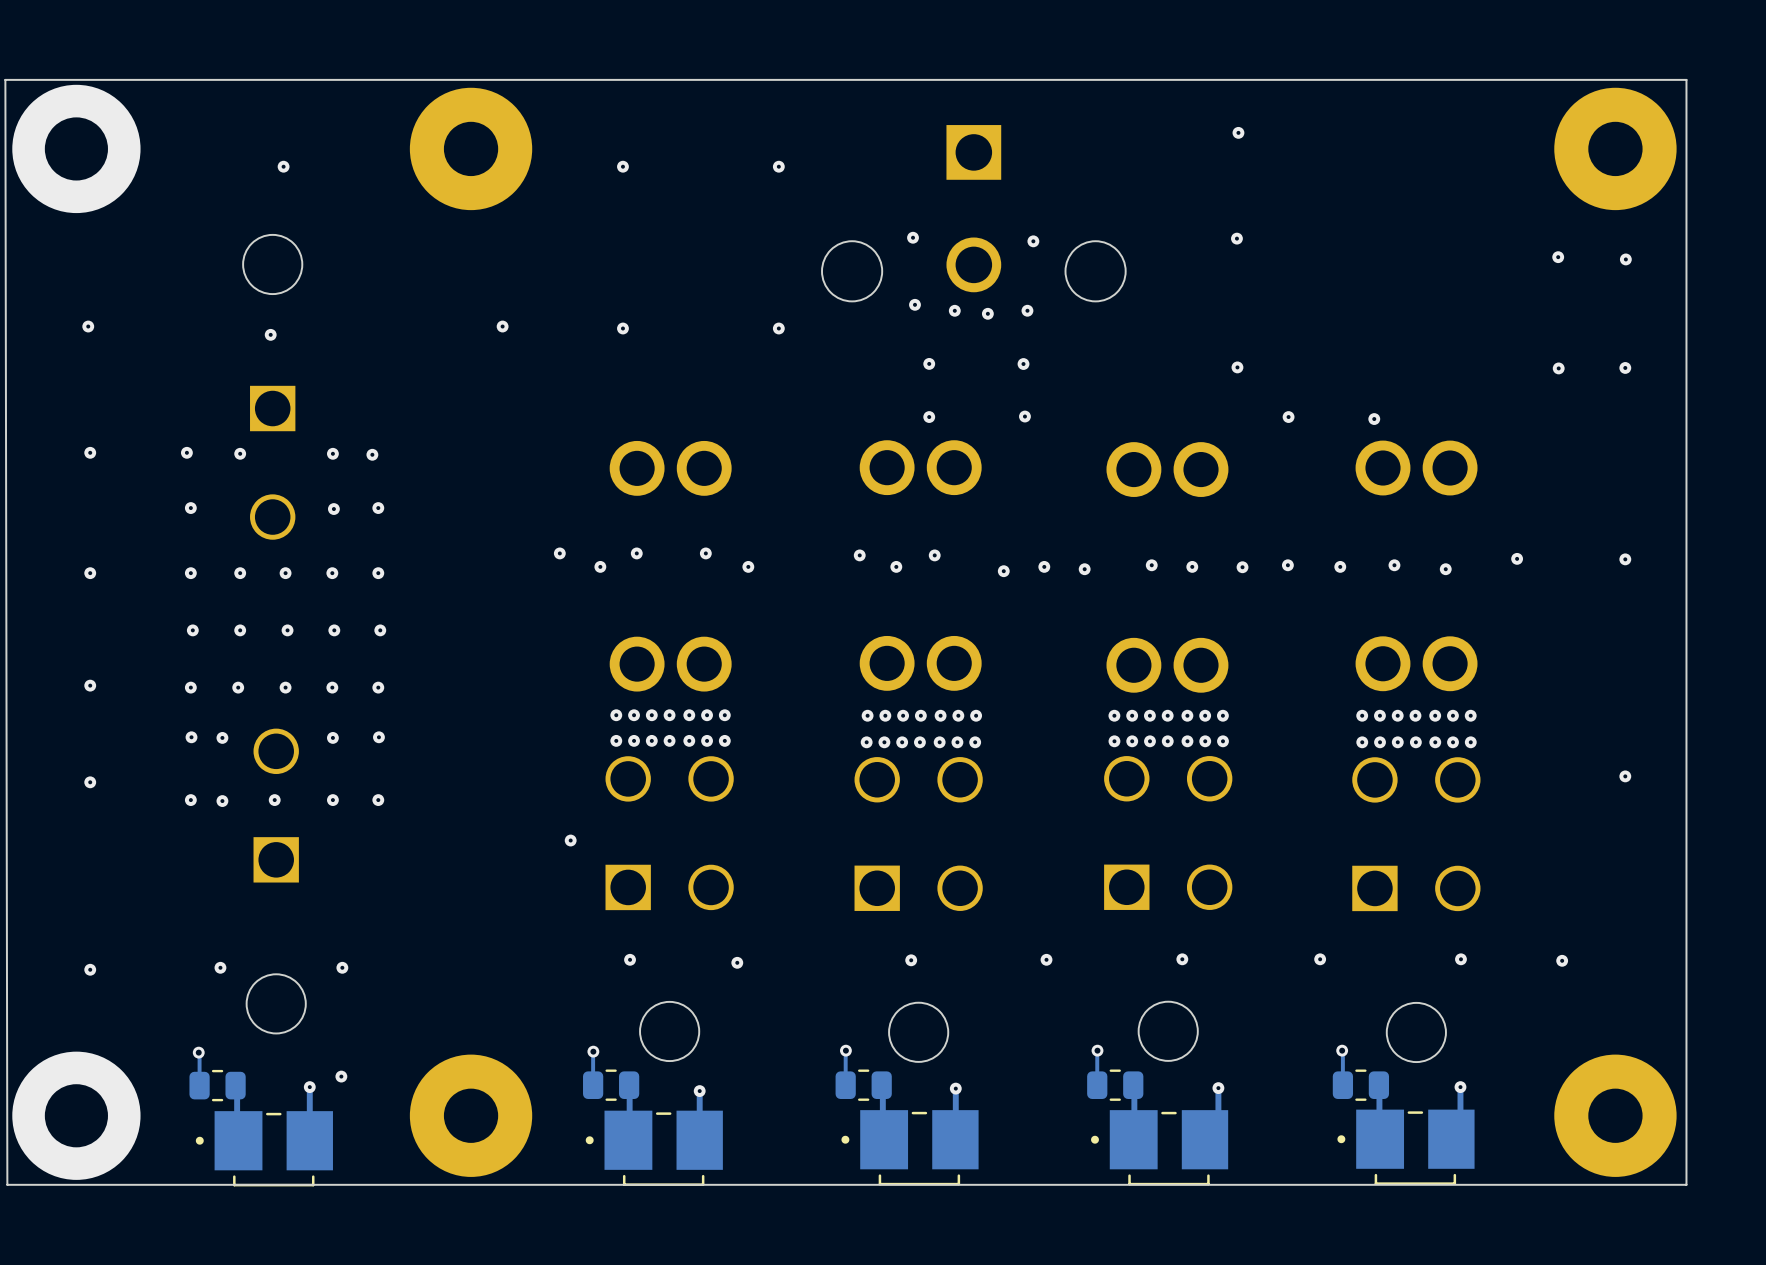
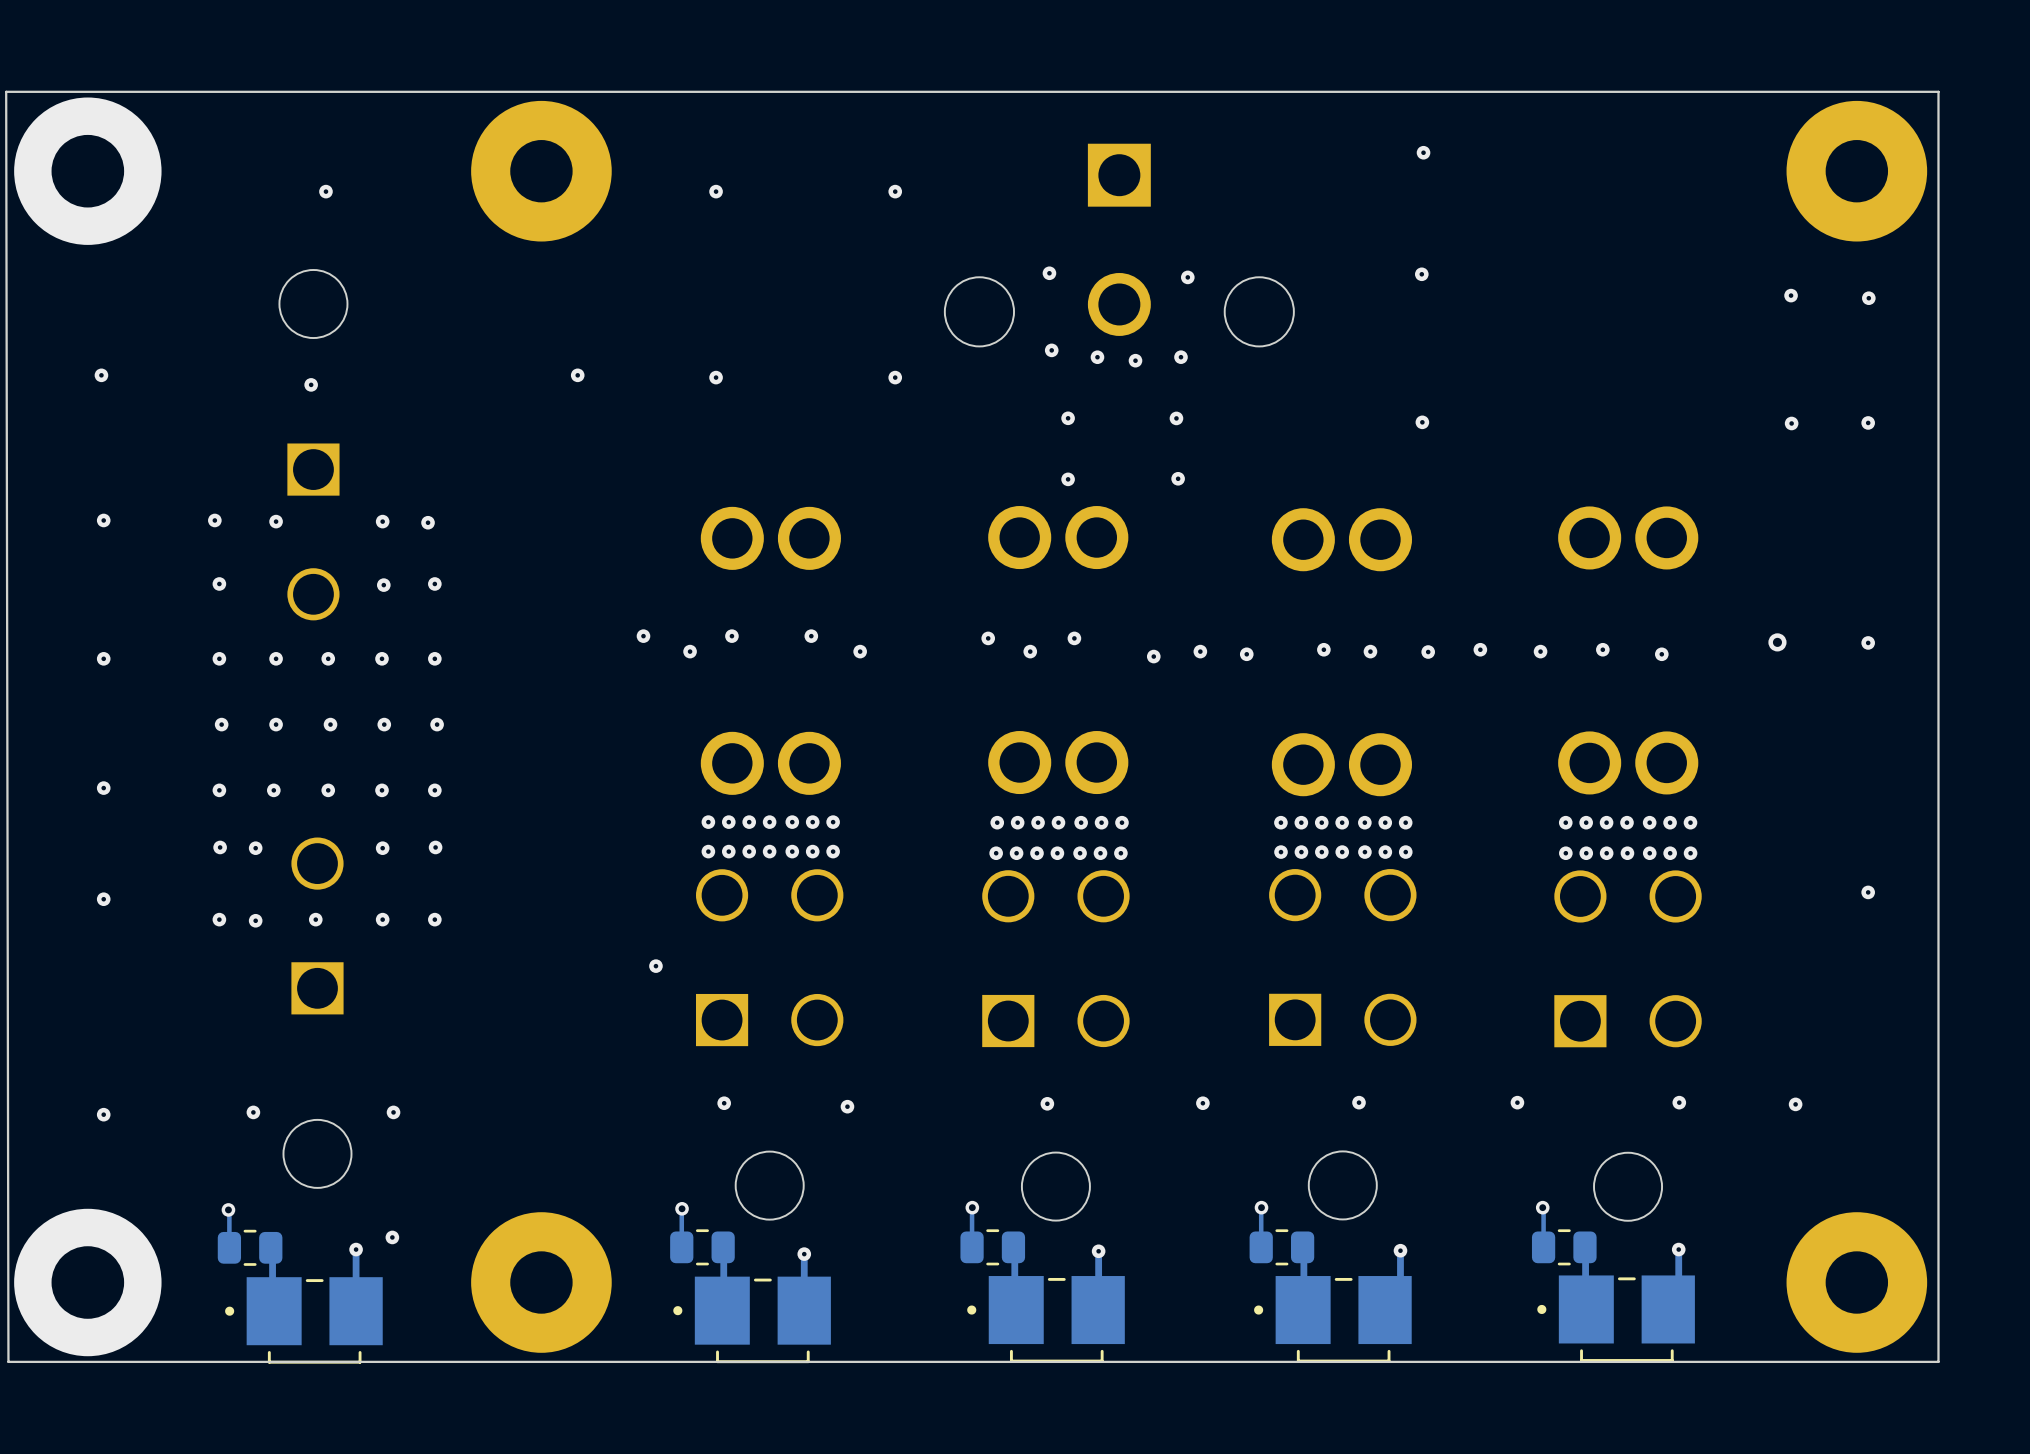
via: (1288, 417) -> none
via: (1374, 419) -> none
via: (1517, 558) -> none
via: none -> (1777, 642)

